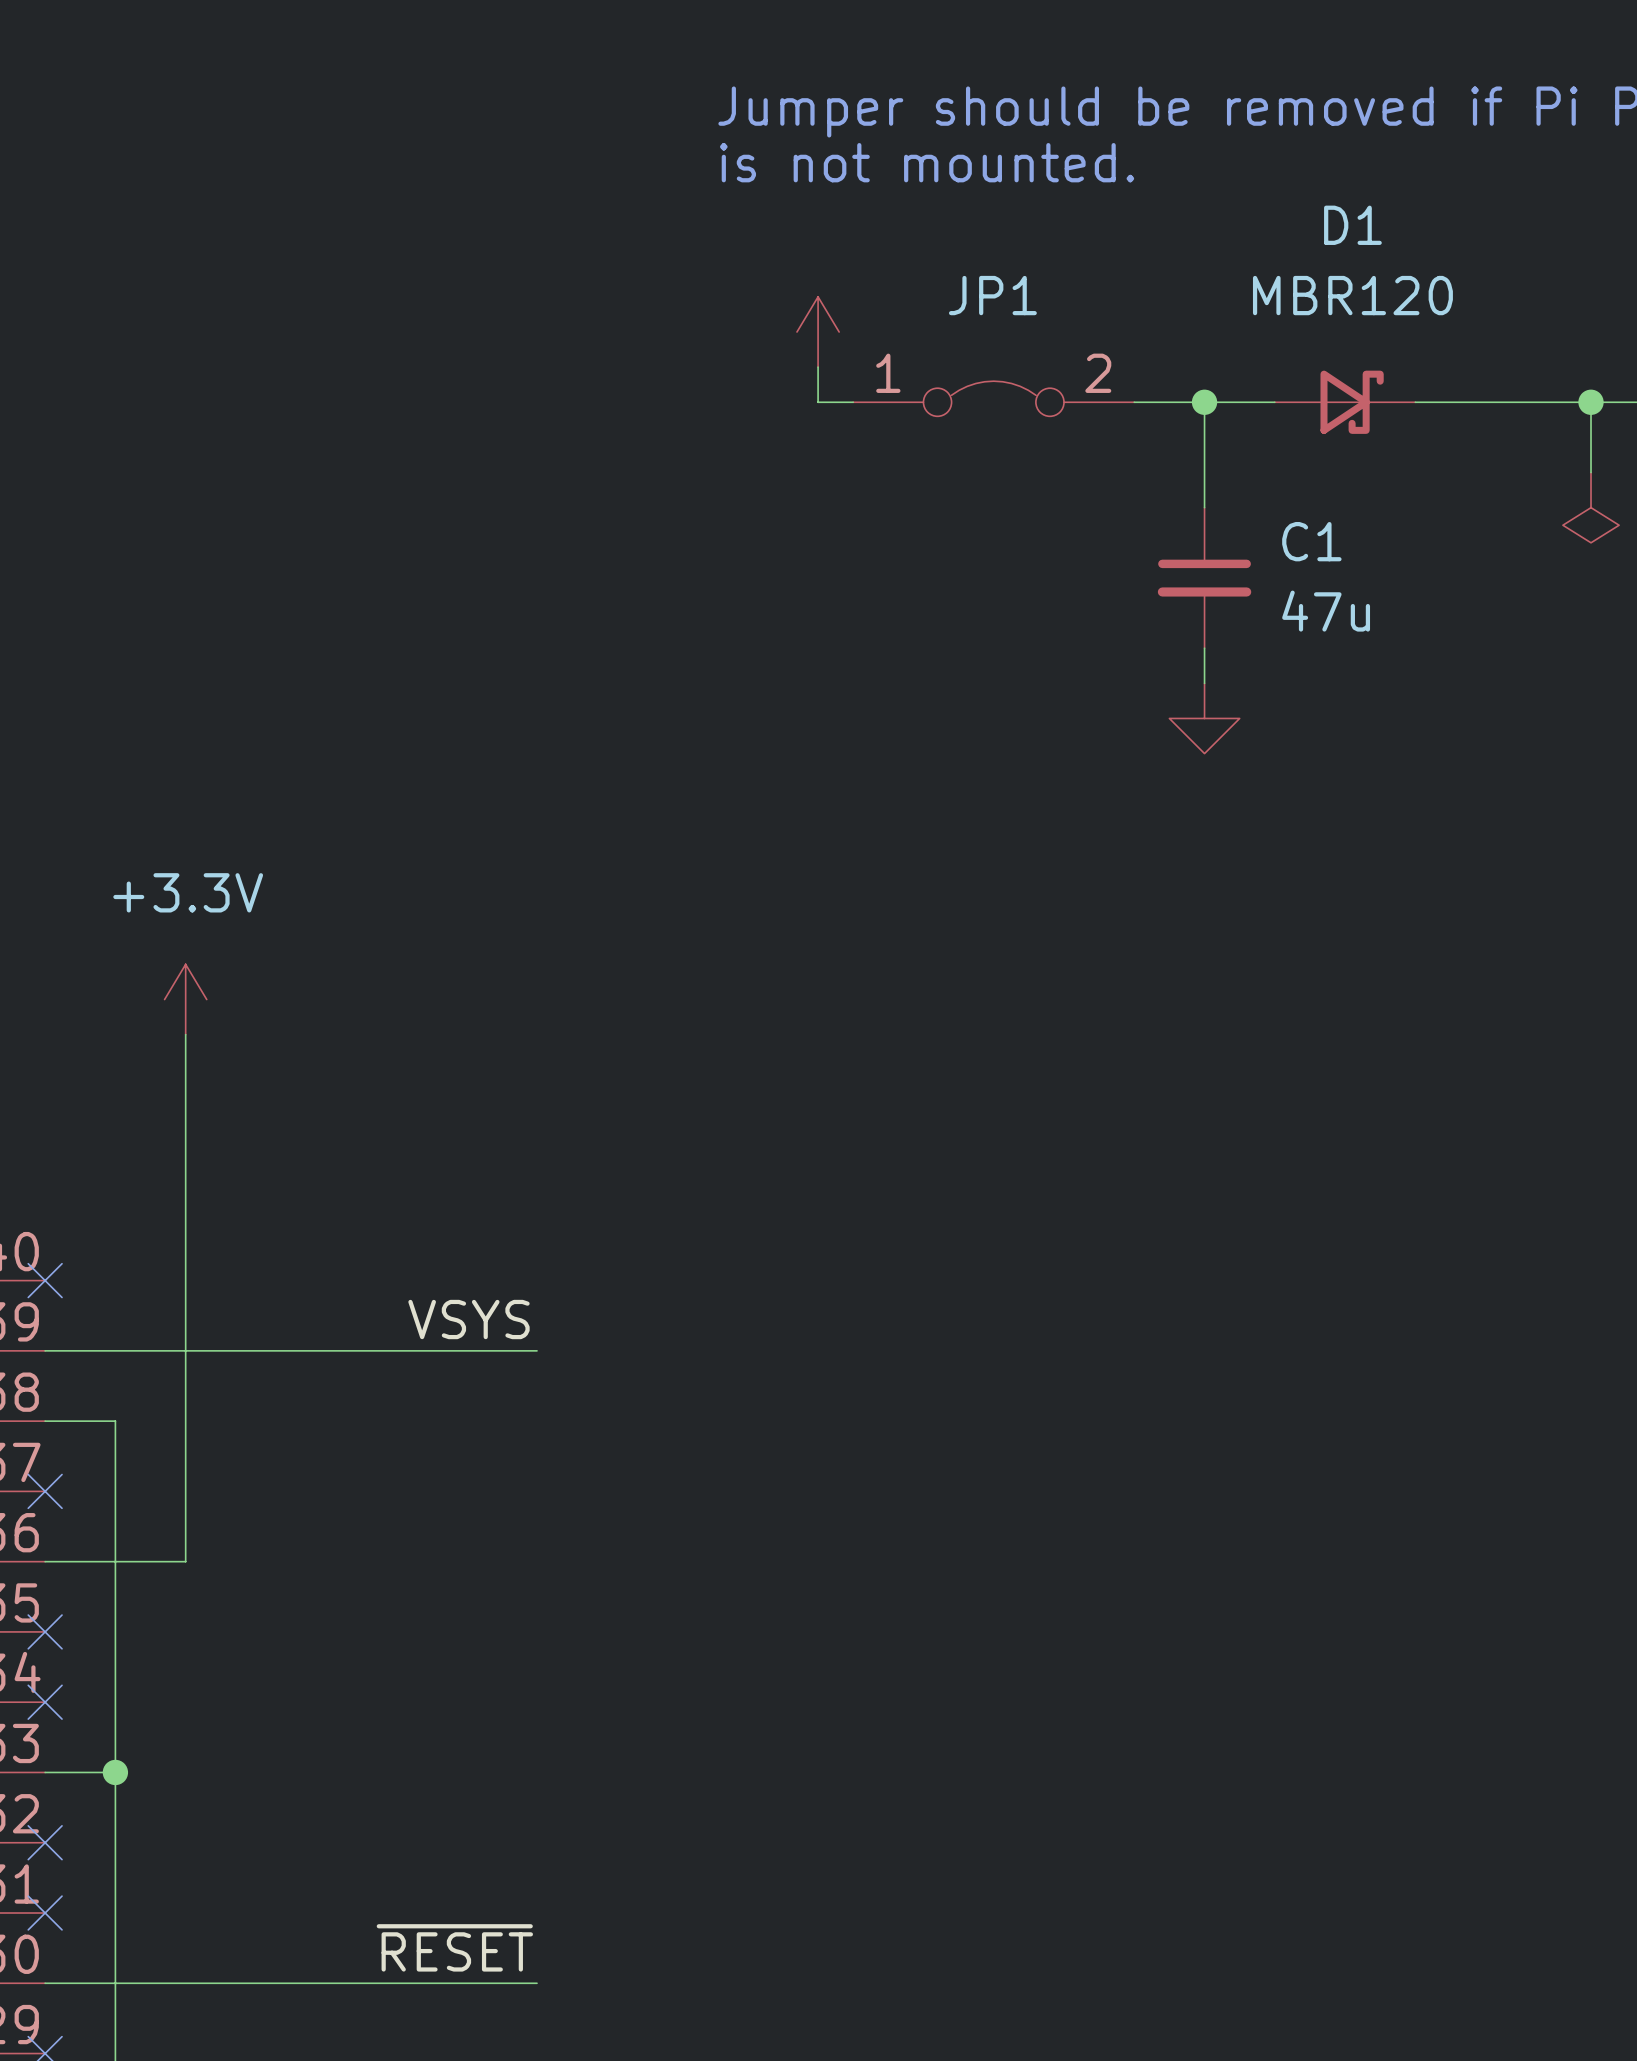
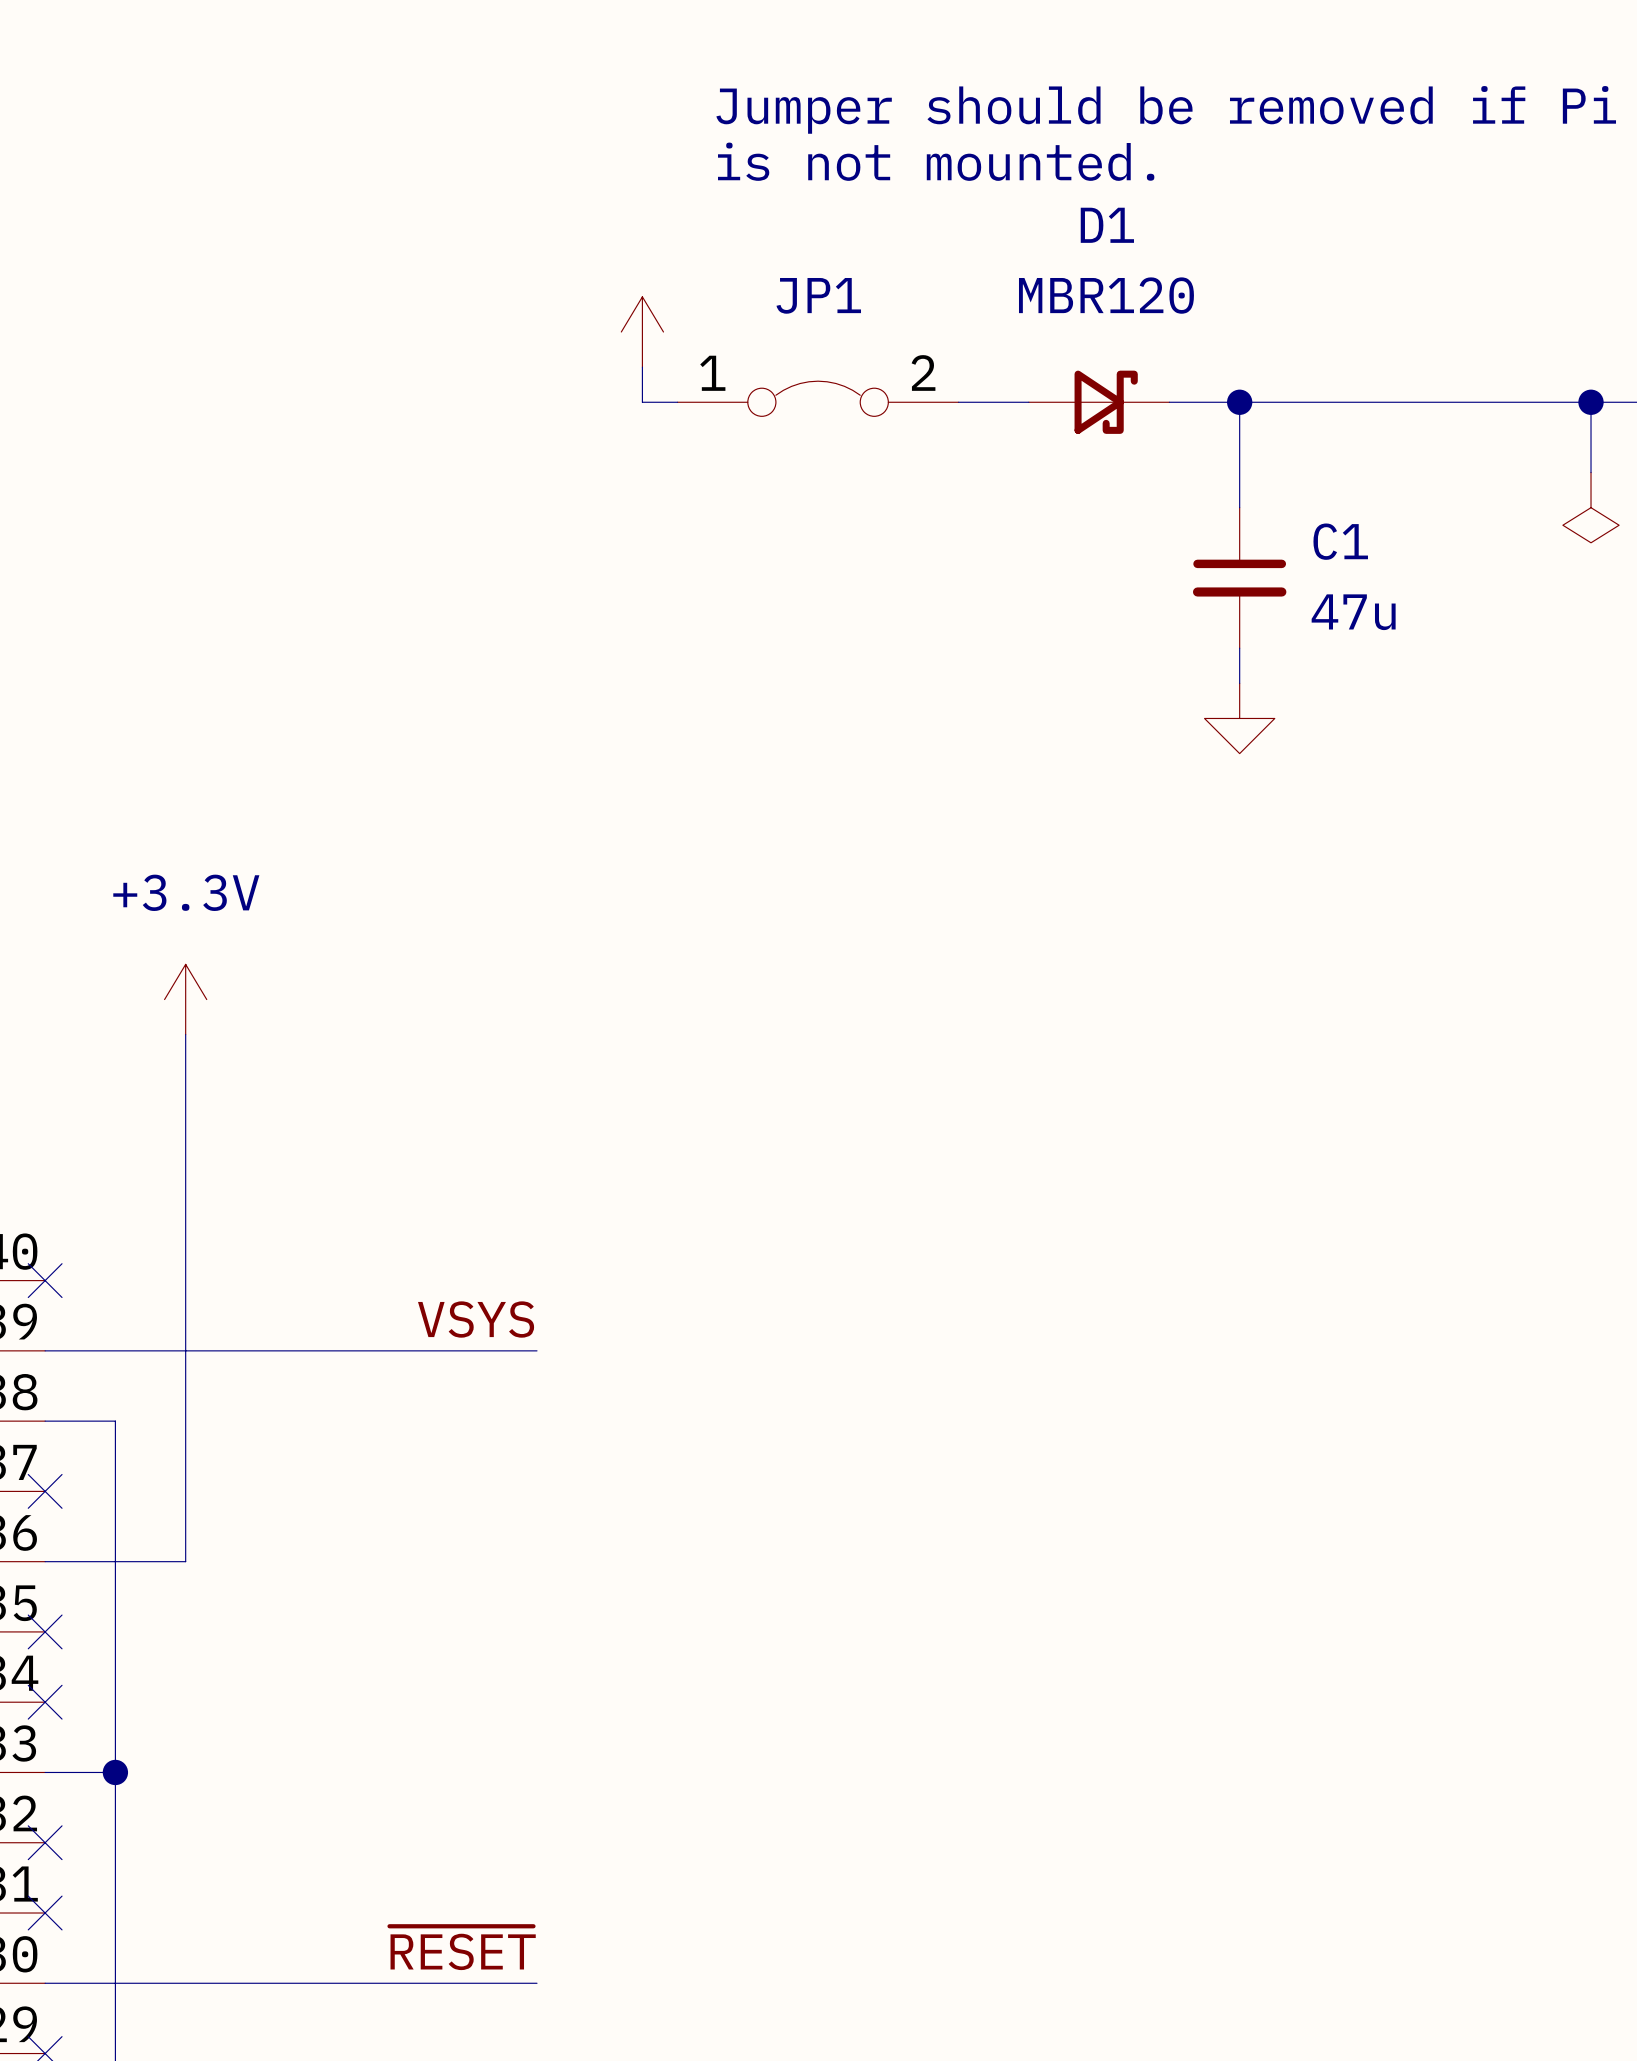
power symbol position: (818, 332) -> (642, 332)
wire: (818, 367) (818, 402) (853, 402) -> (642, 367) (642, 402) (677, 402)
JP1 position: (993, 398) -> (818, 398)
wire: none -> (958, 402) (1028, 402)
wire: (1204, 402) (1204, 507) -> (1239, 402) (1239, 507)
junction position: (1204, 402) -> (1239, 402)
D1 position: (1345, 402) -> (1099, 402)
C1 position: (1204, 577) -> (1239, 577)
wire: (1204, 648) (1204, 683) -> (1239, 648) (1239, 683)
power symbol position: (1204, 718) -> (1239, 718)

